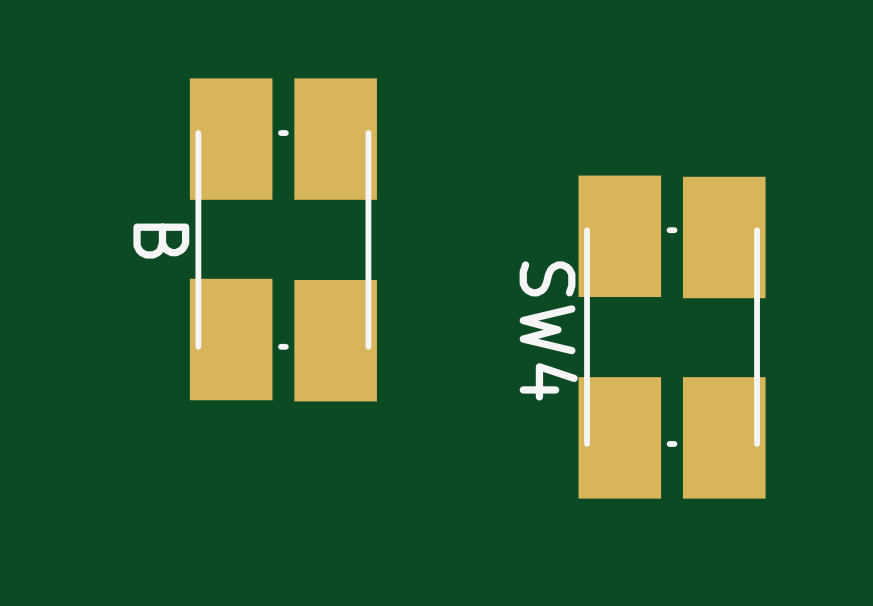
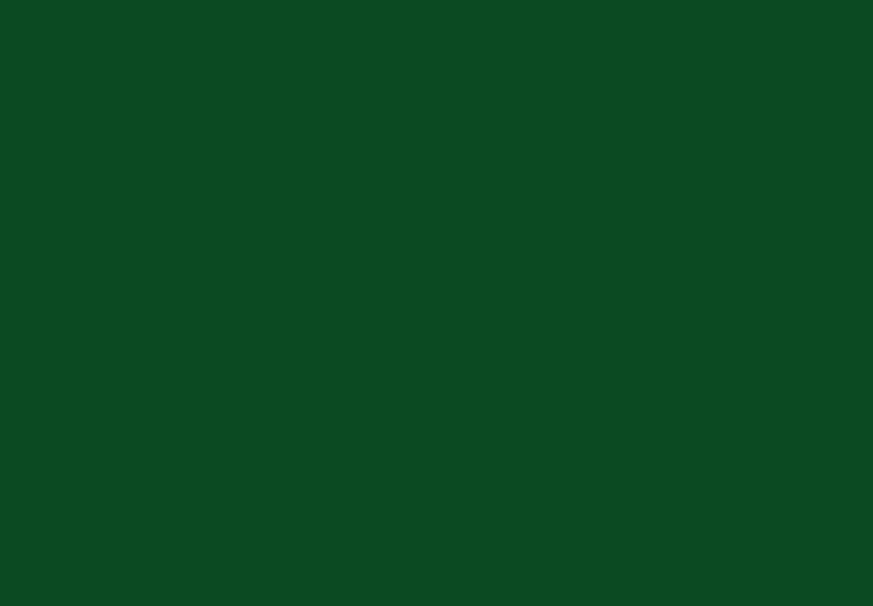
part: B (283, 239) -> none
SW4: (672, 337) -> none

